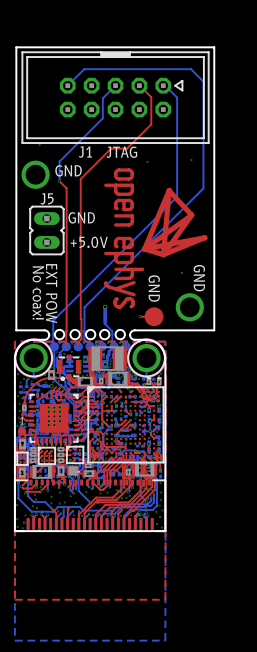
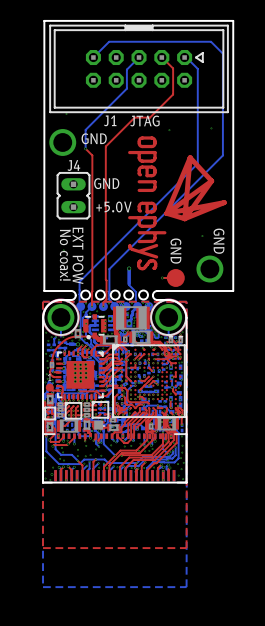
J5 name: J5 (47, 198) -> J4 (73, 165)

